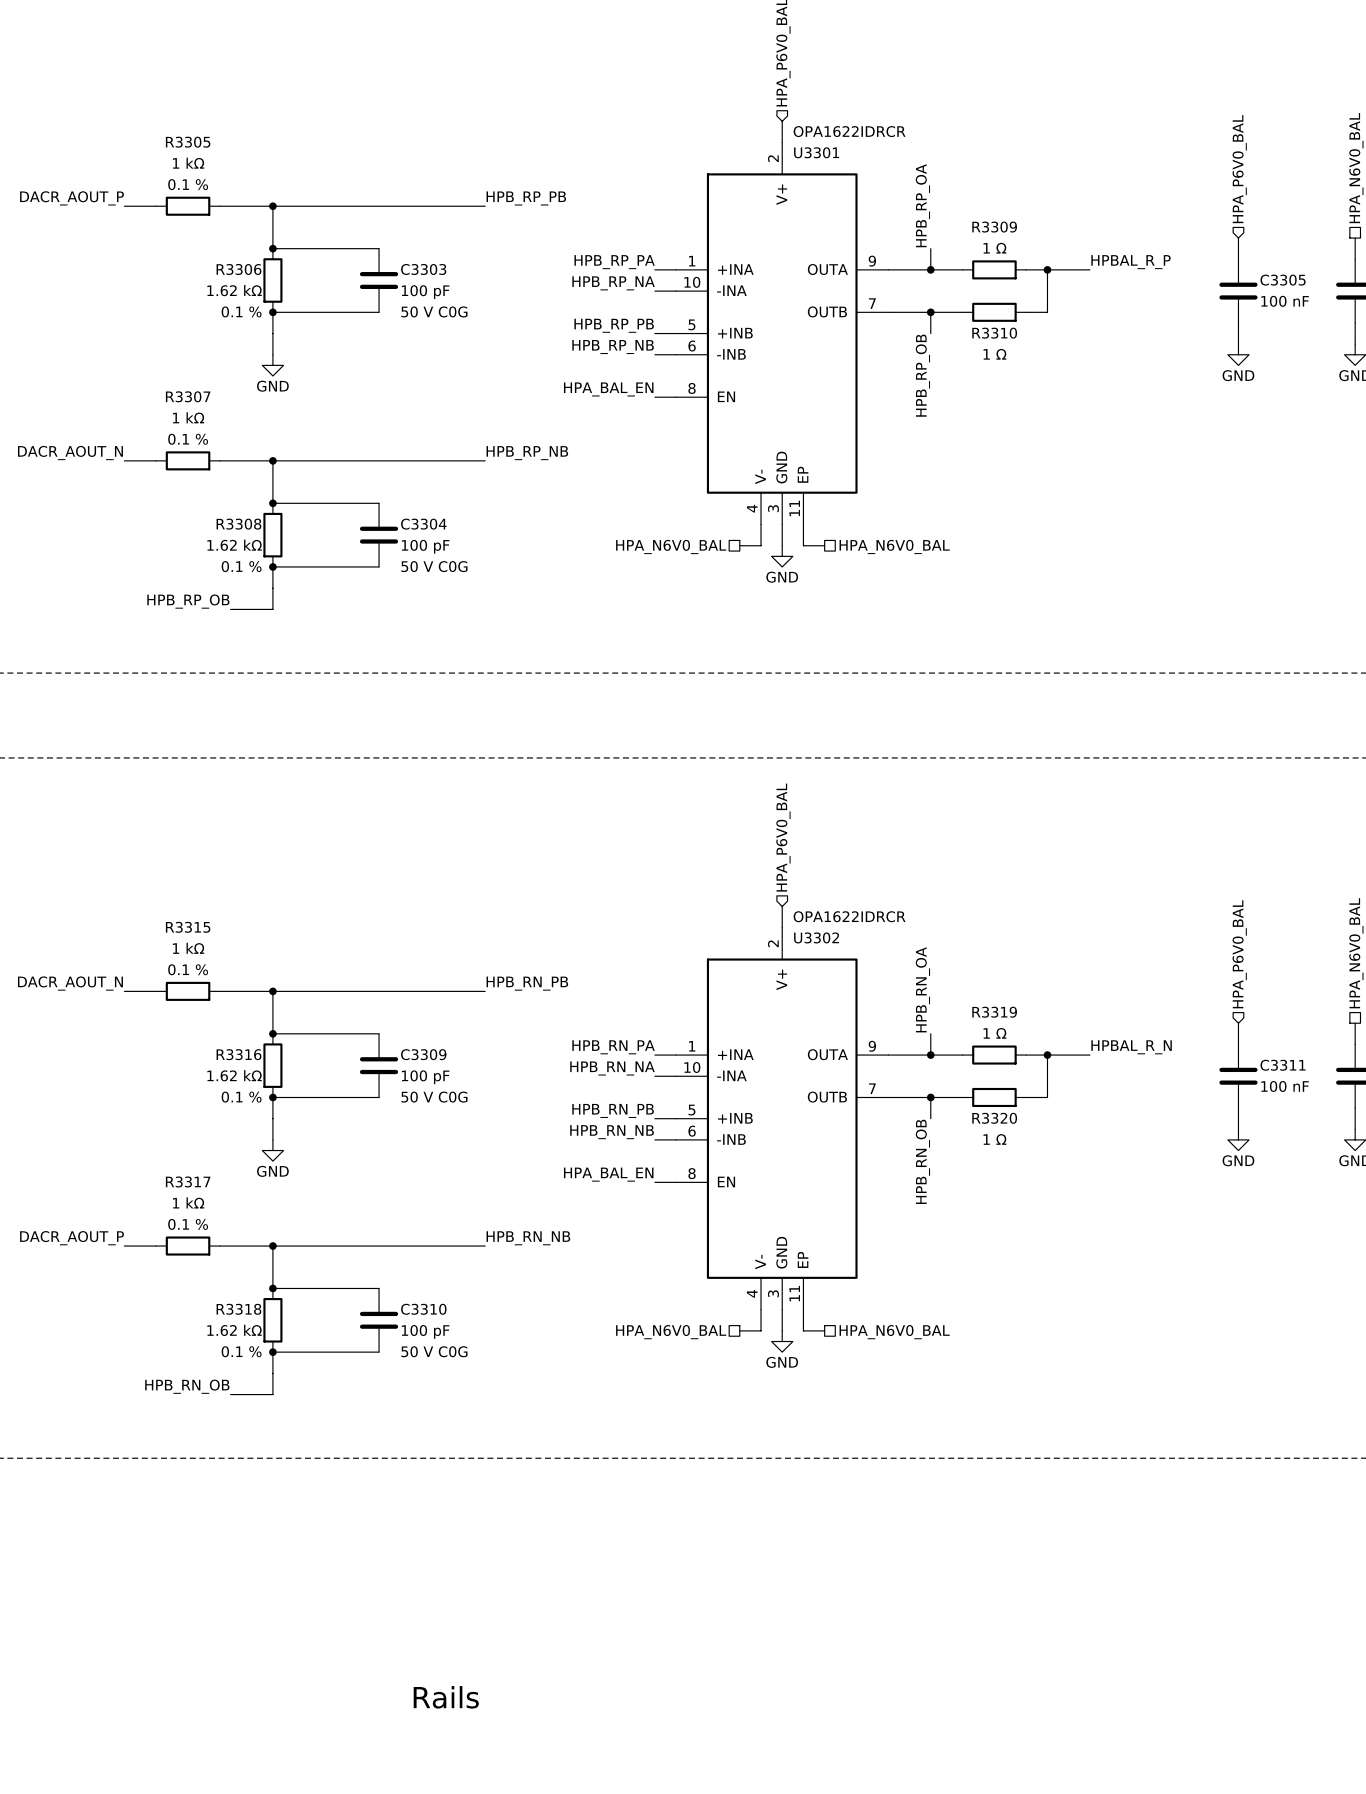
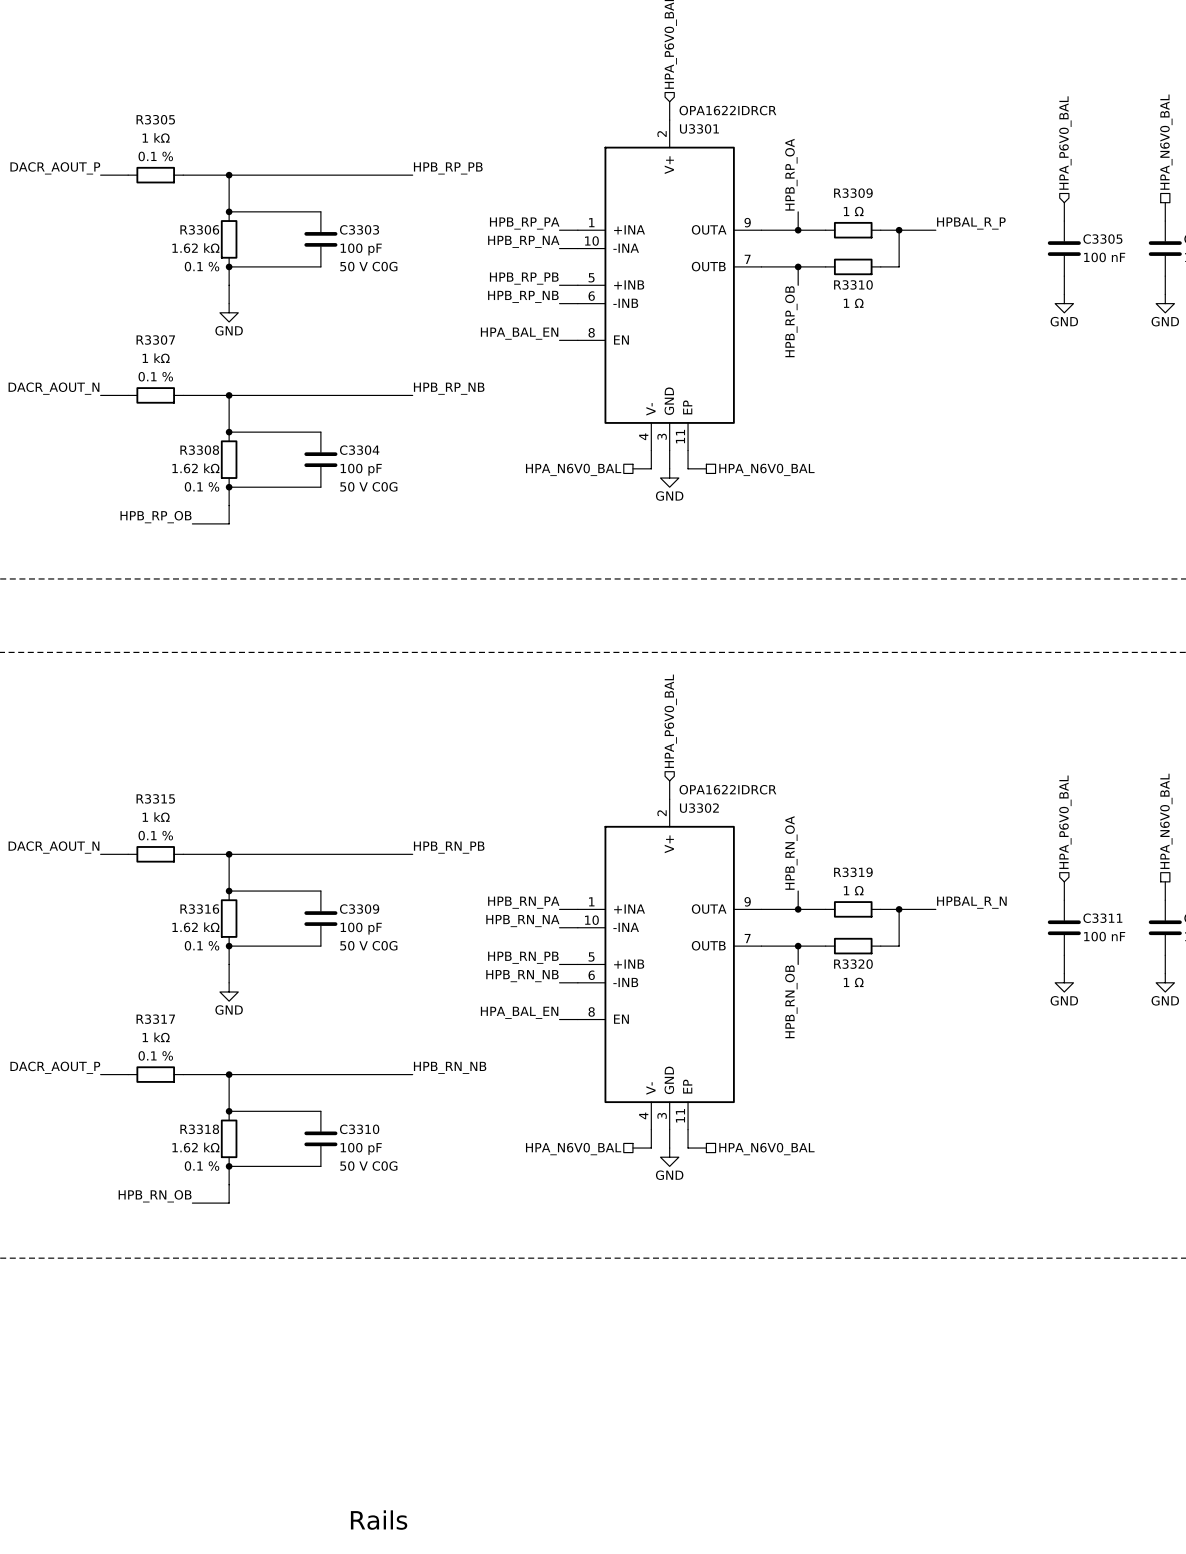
text position: Rails (446, 1697) -> Rails (379, 1520)

